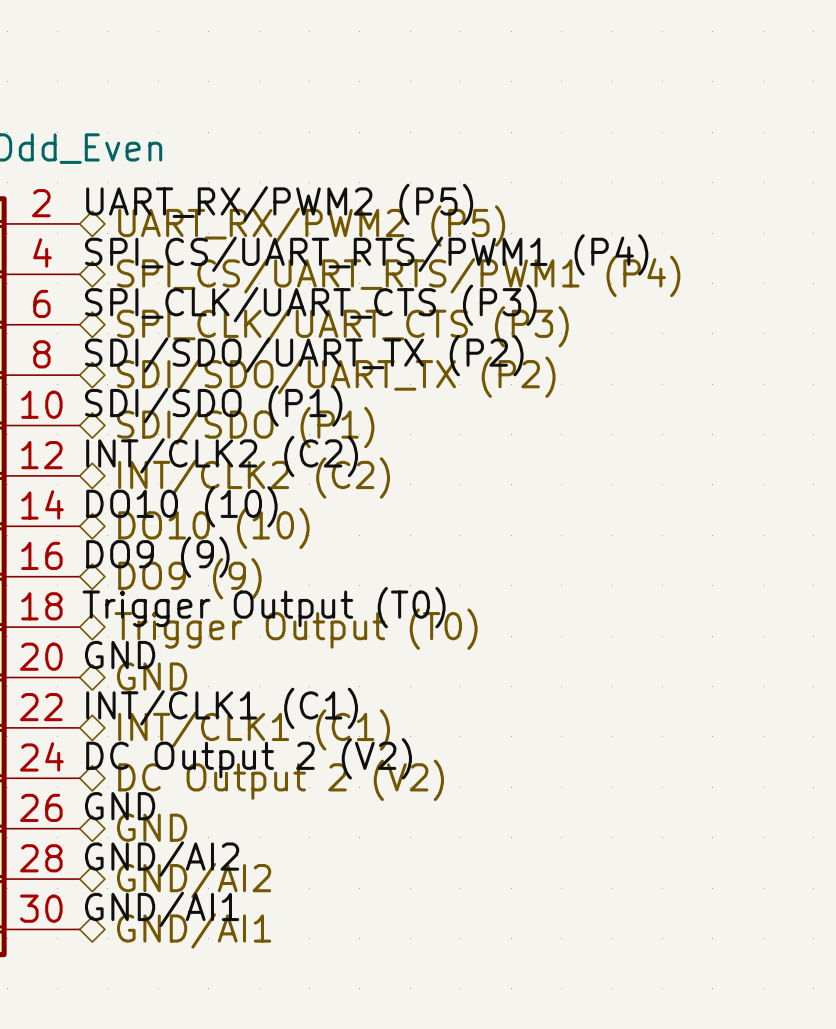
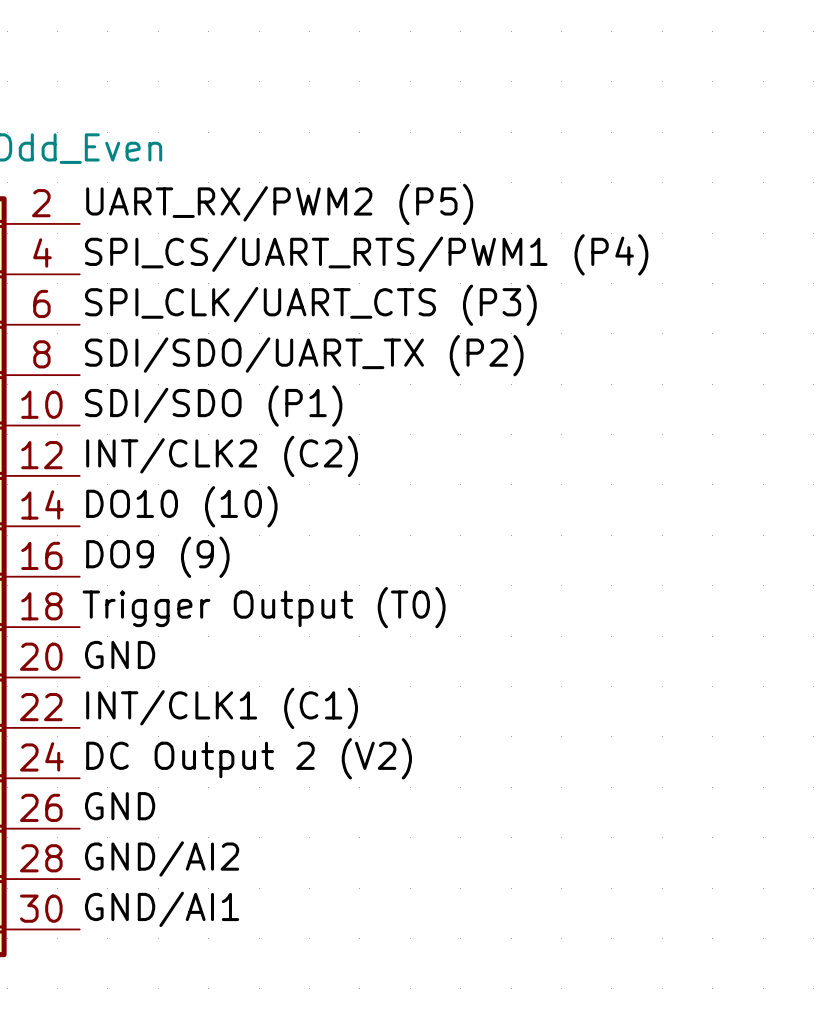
hierarchical label: UART_RX/PWM2 (P5) (311, 226) -> none
hierarchical label: SPI_CS/UART_RTS/PWM1 (P4) (398, 276) -> none
hierarchical label: SPI_CLK/UART_CTS (P3) (342, 326) -> none
hierarchical label: SDI/SDO/UART_TX (P2) (336, 377) -> none
hierarchical label: SDI/SDO (P1) (245, 427) -> none
hierarchical label: INT/CLK2 (C2) (254, 477) -> none
hierarchical label: DO10 (10) (213, 528) -> none
hierarchical label: DO9 (9) (189, 578) -> none
hierarchical label: Trigger Output (T0) (296, 629) -> none
hierarchical label: GND (152, 676) -> none
hierarchical label: INT/CLK1 (C1) (254, 729) -> none
hierarchical label: DC Output 2 (V2) (281, 780) -> none
hierarchical label: GND (152, 827) -> none
hierarchical label: GND/AI2 (194, 880) -> none
hierarchical label: GND/AI1 (194, 930) -> none

